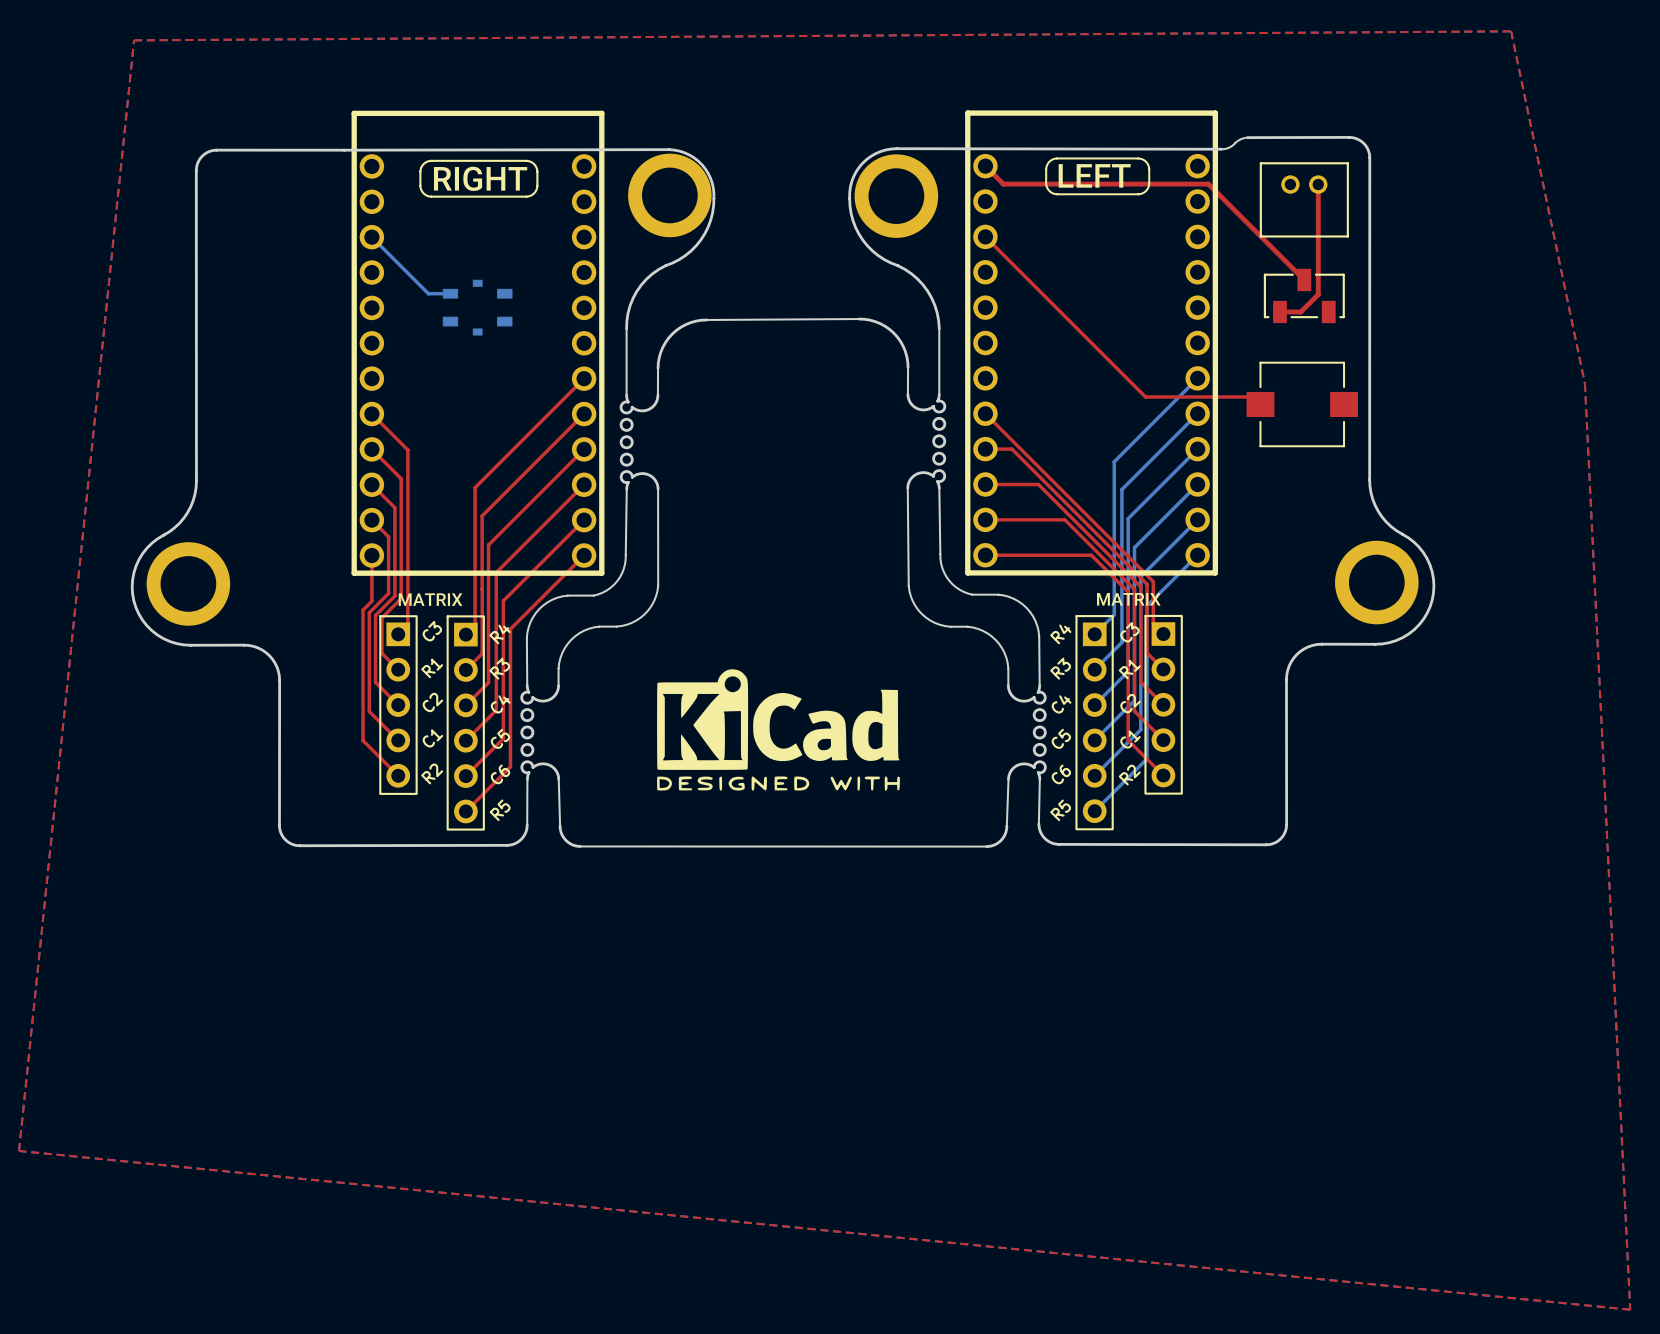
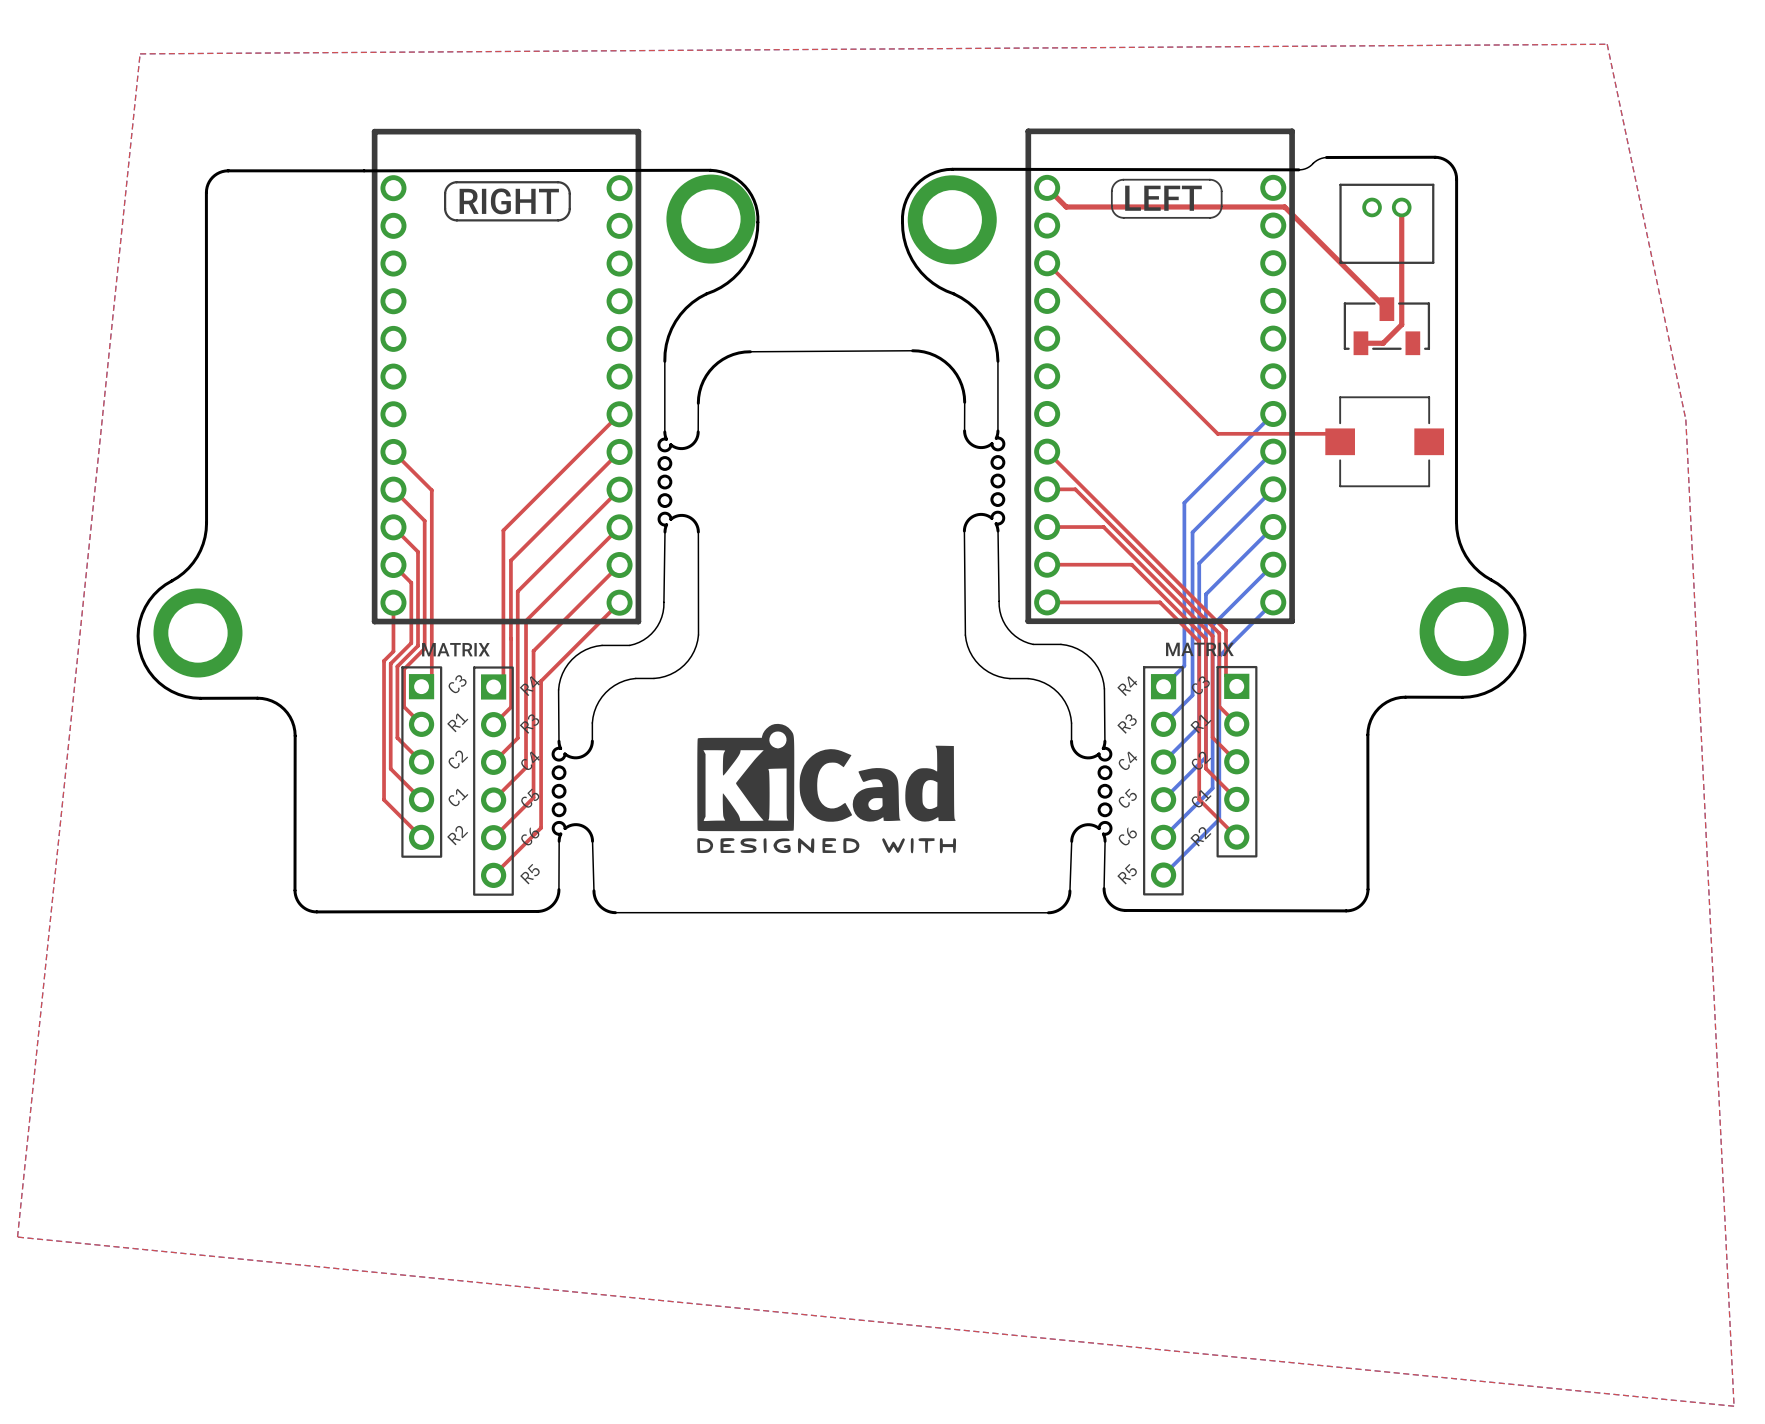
bottom track: (371, 237) (428, 293) (450, 293) -> none
part: (477, 307) -> none

